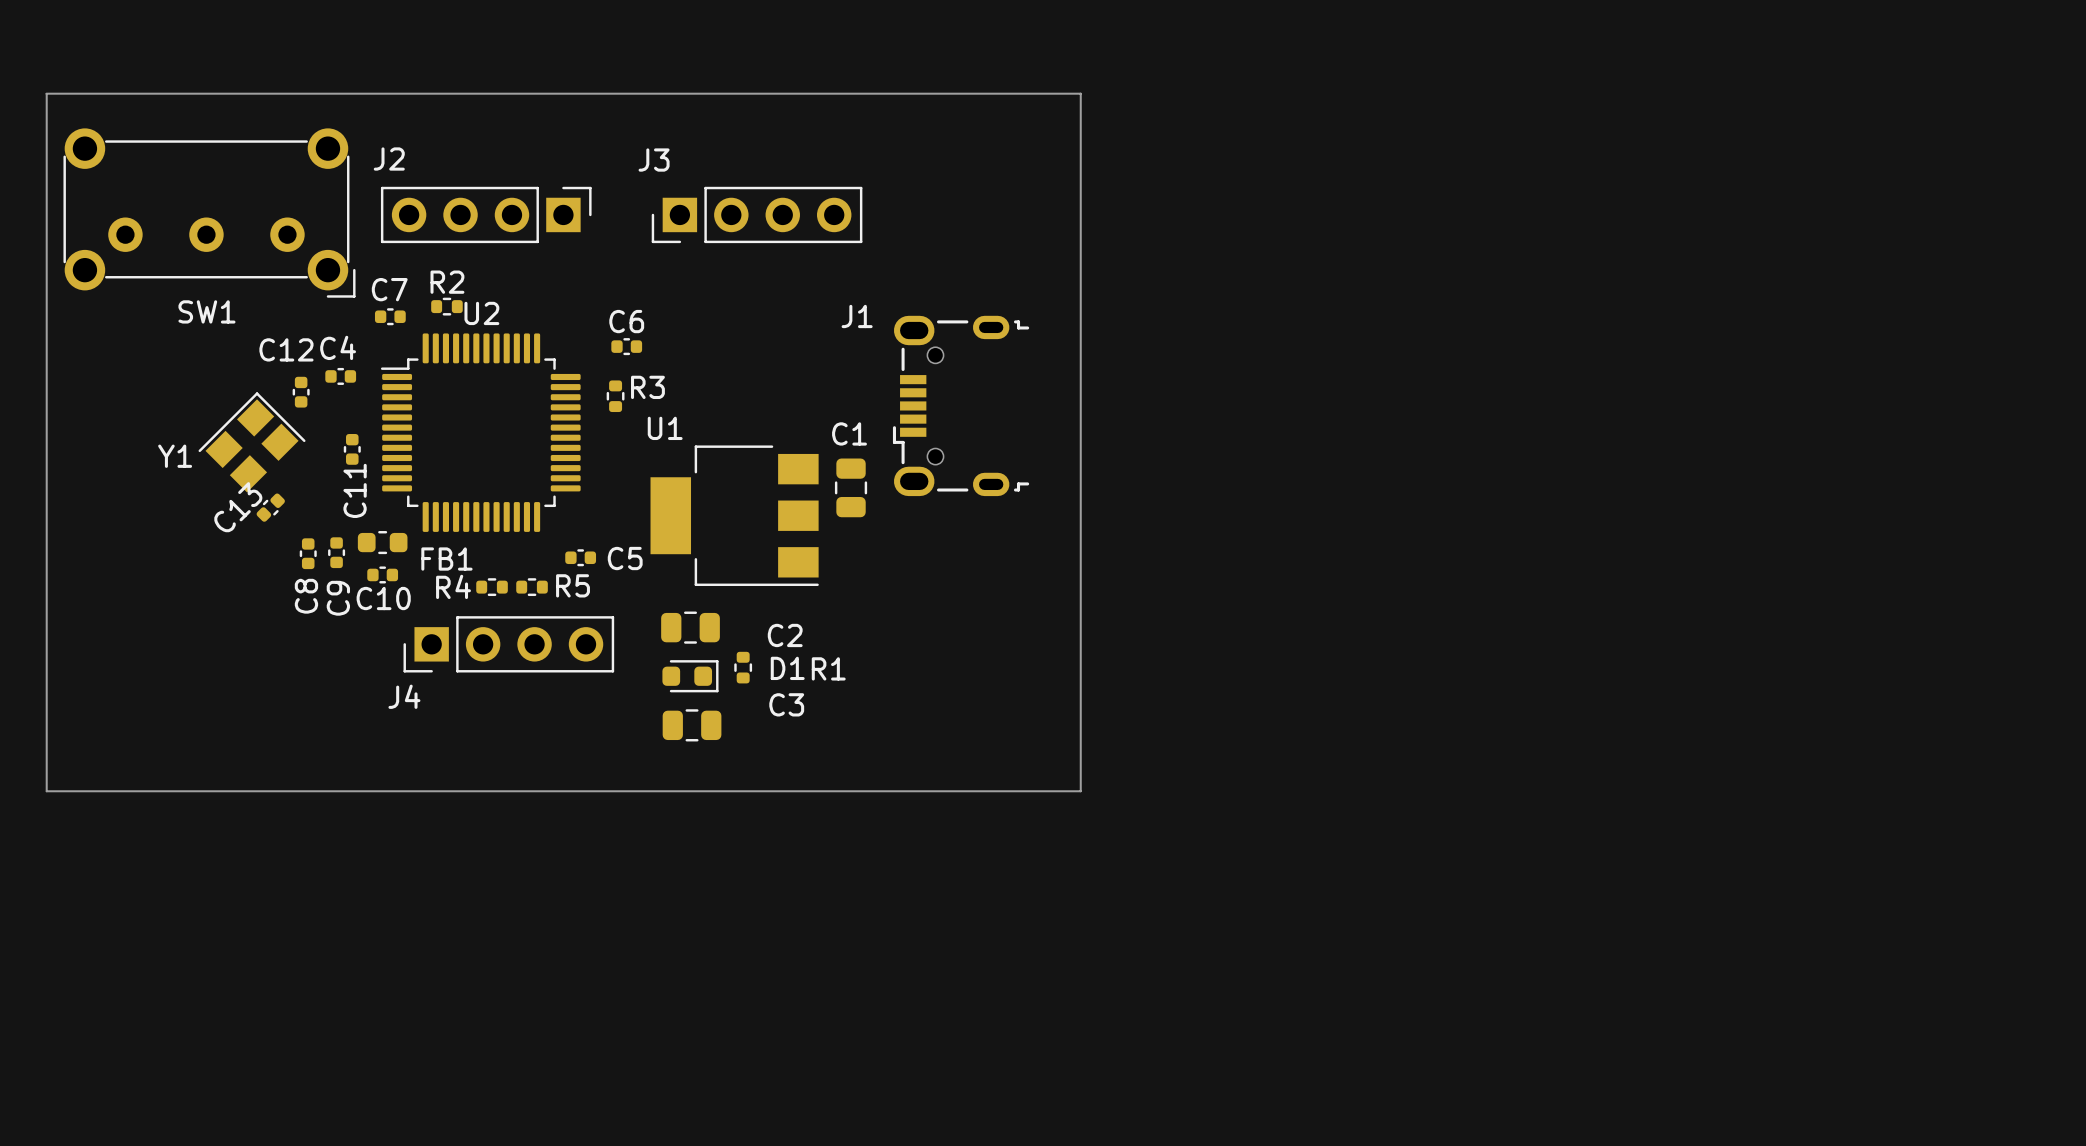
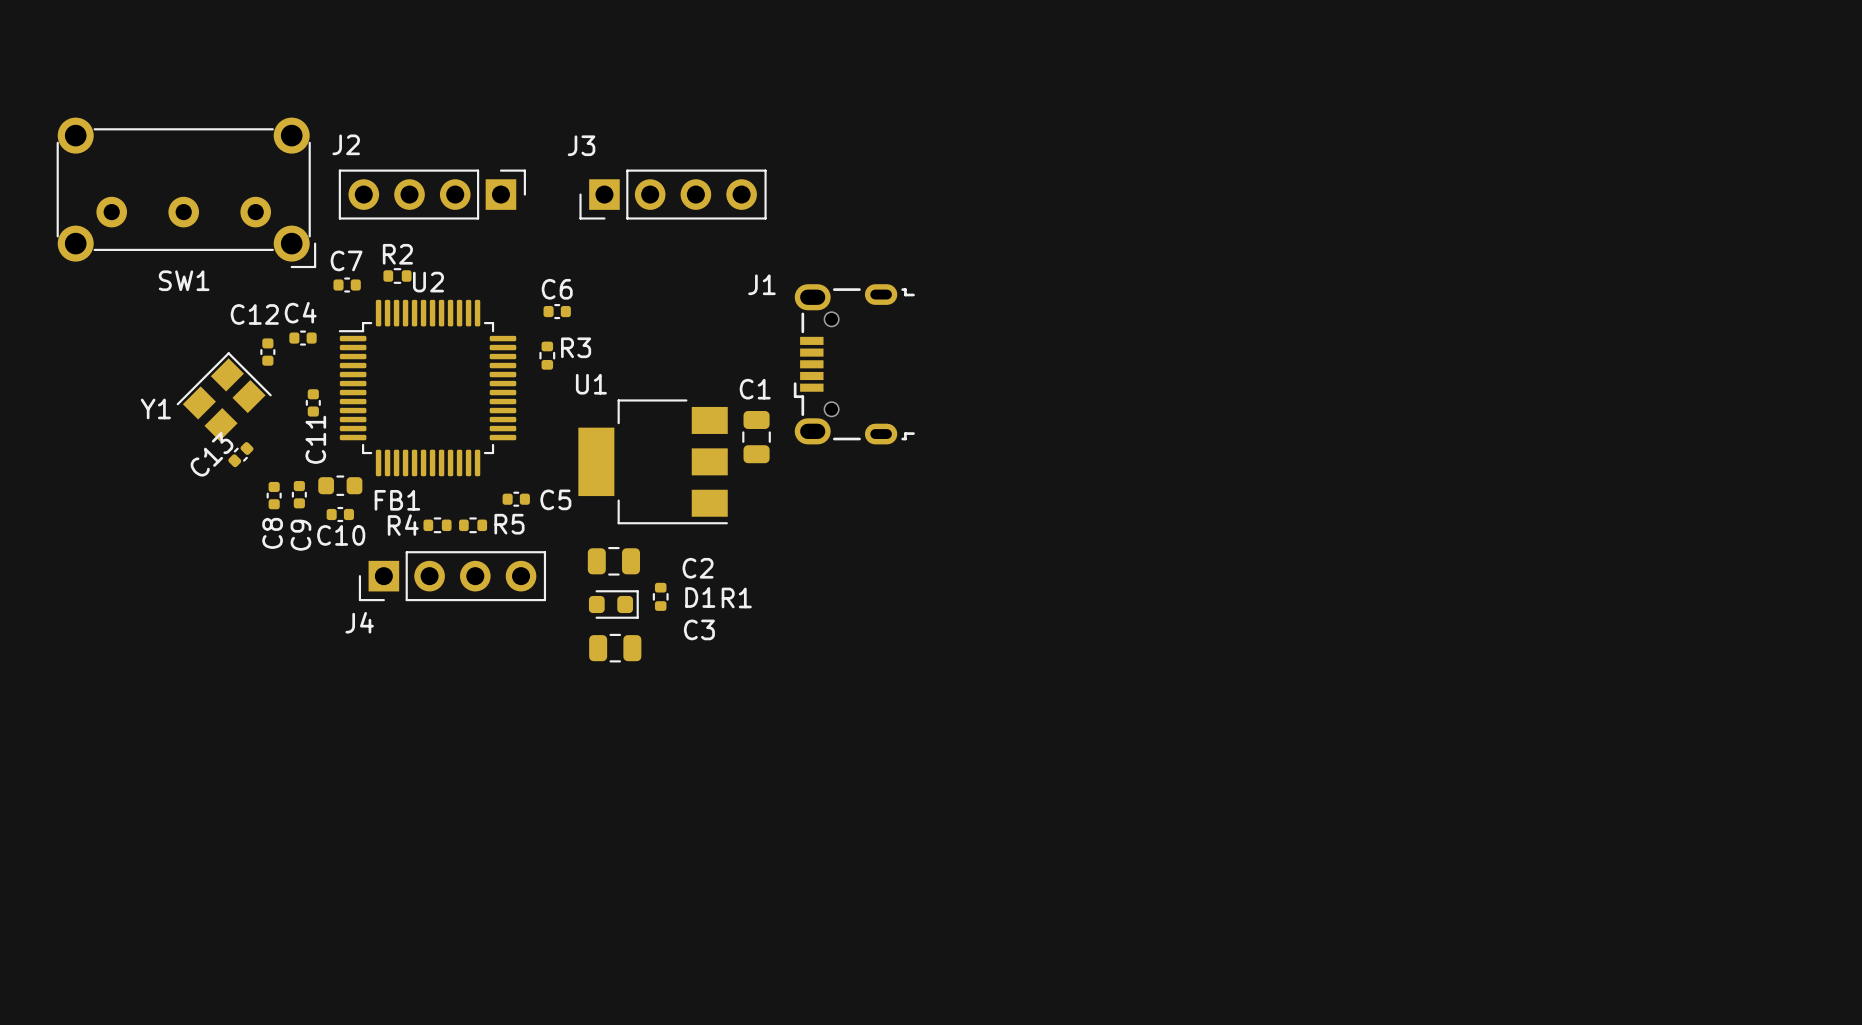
board edge: (46, 93) (1080, 93) (1080, 791) (46, 791) (46, 93) -> none

